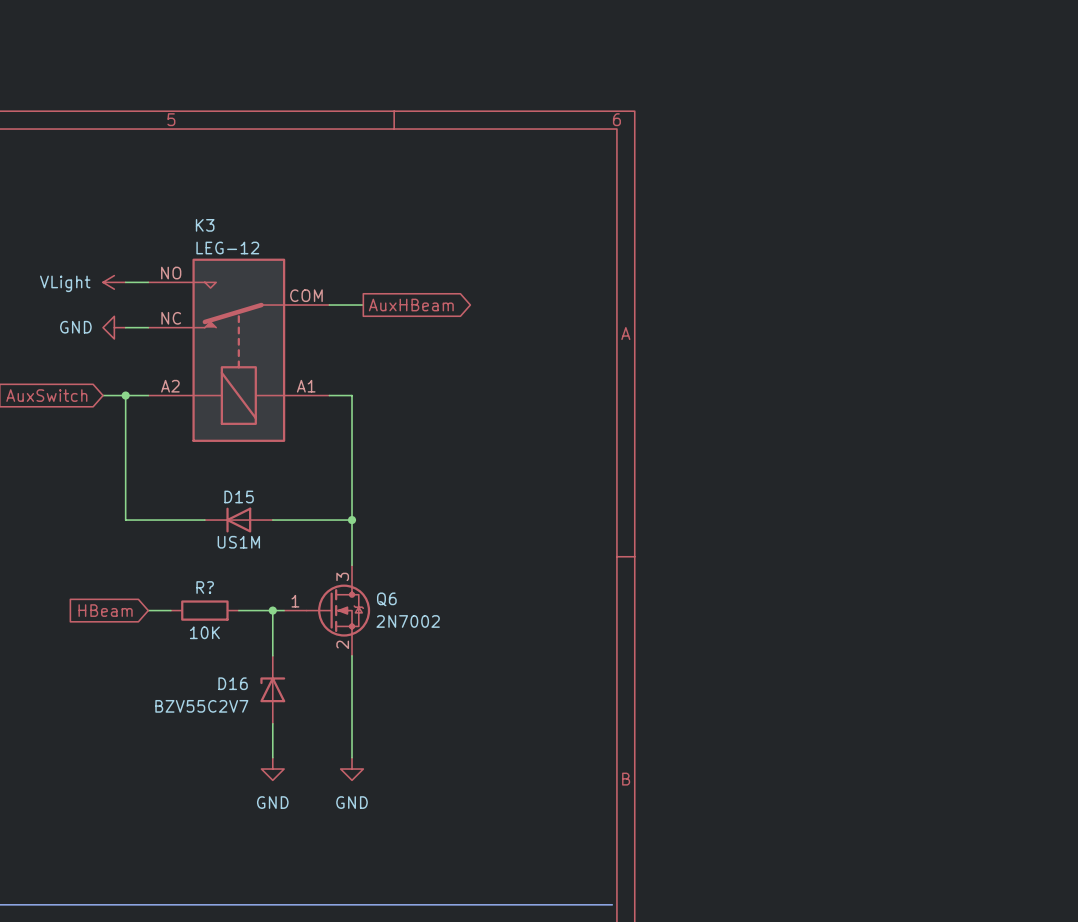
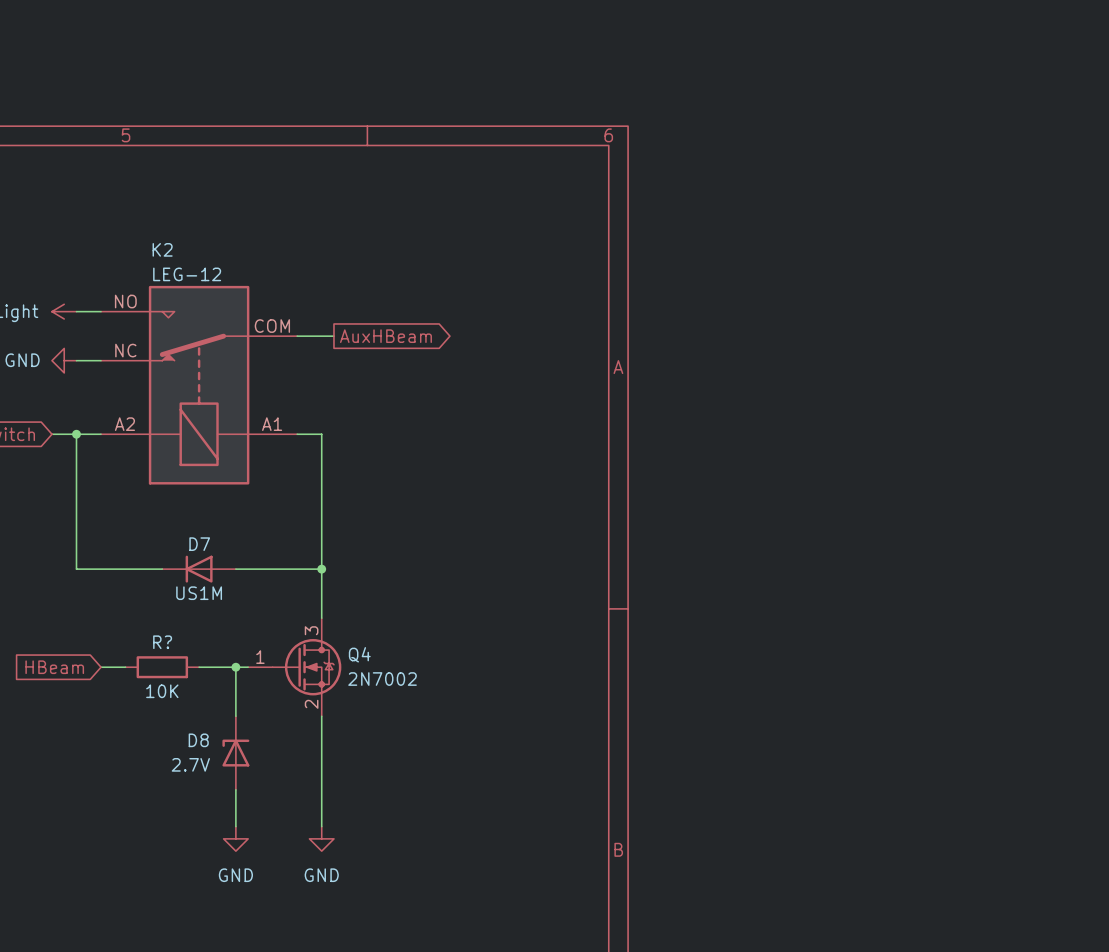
K3 name: K3 (205, 225) -> K2 (162, 249)
D15 name: D15 (239, 496) -> D7 (199, 544)
Q6 name: Q6 (386, 599) -> Q4 (359, 654)
D16 name: D16 (233, 683) -> D8 (198, 740)
D16 value: BZV55C2V7 (201, 706) -> 2.7V (190, 764)

